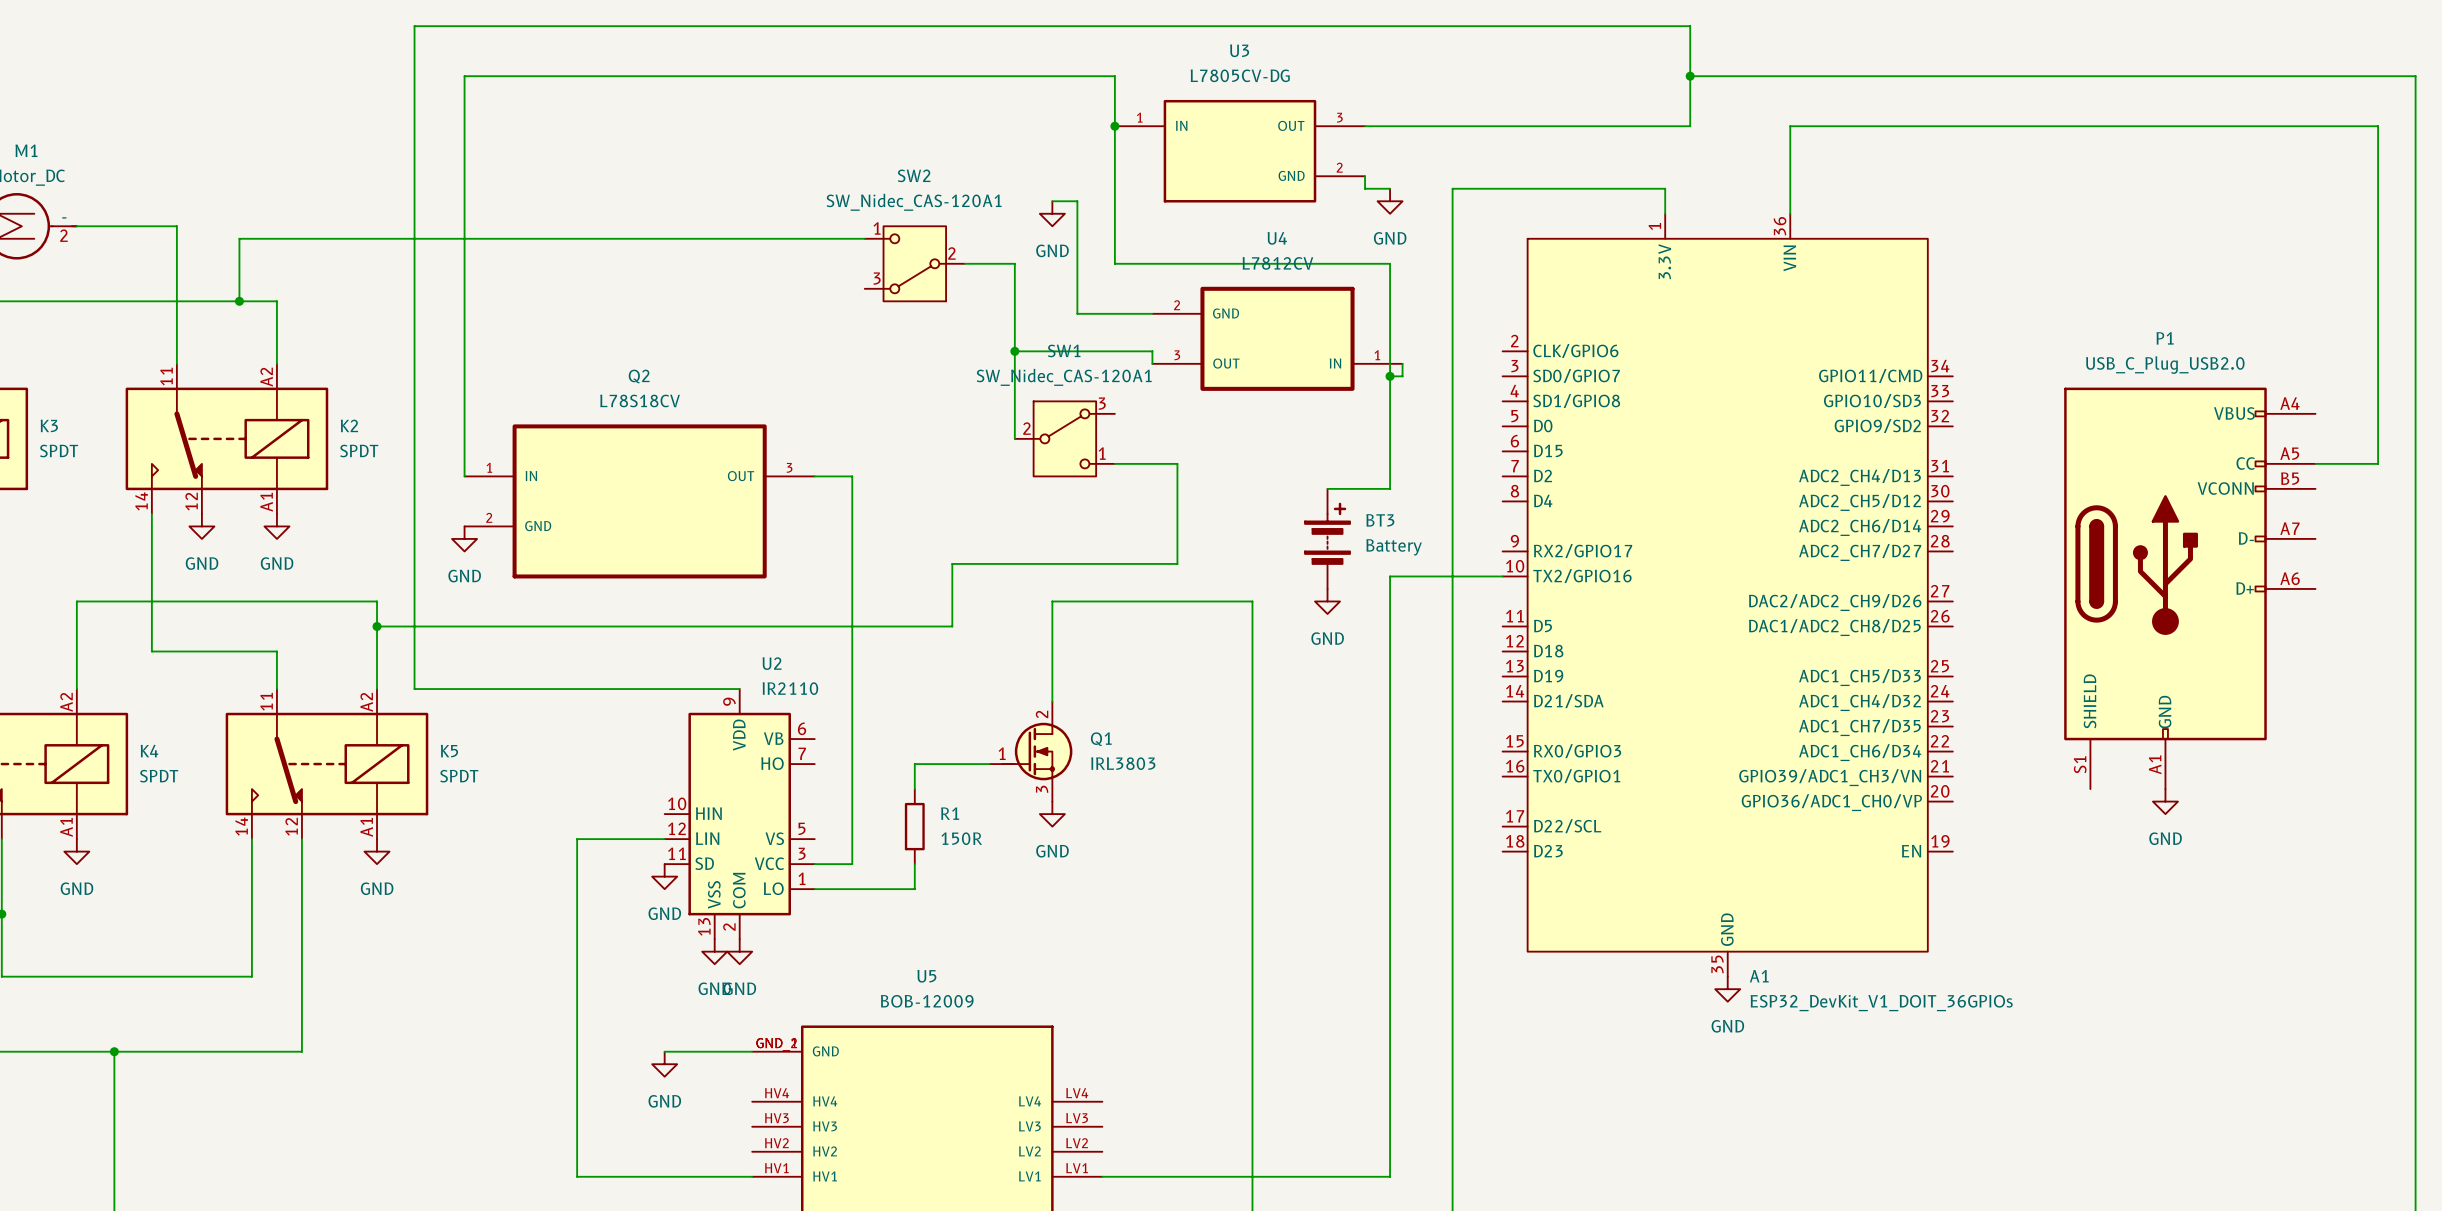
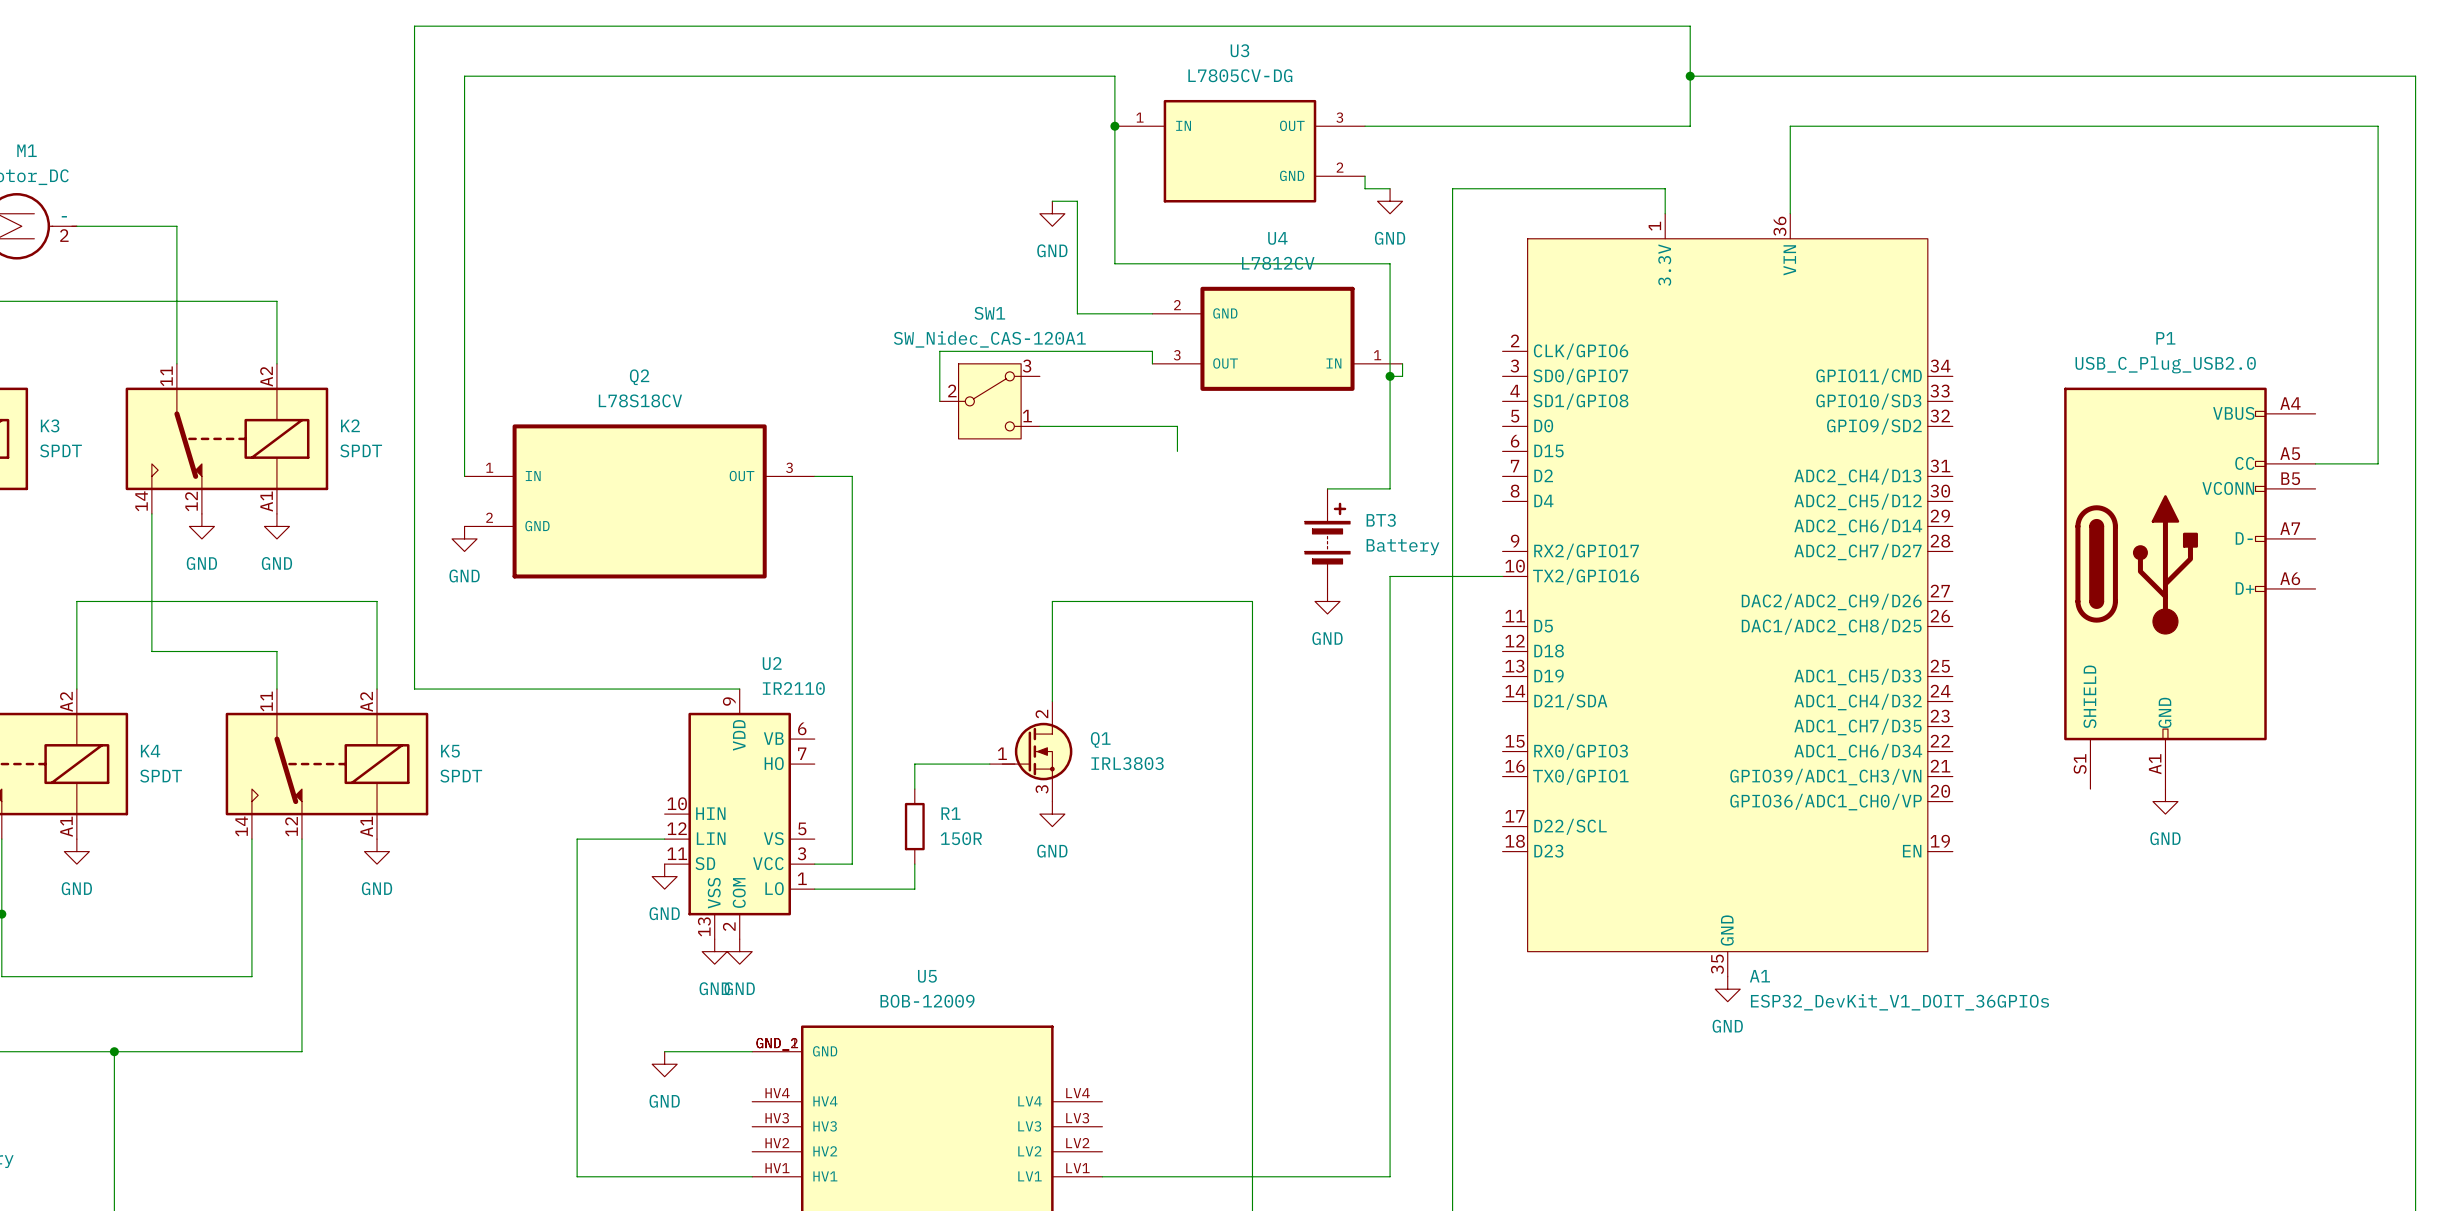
wire: (864, 238) (239, 238) (239, 301) -> none
SW2: SW_Nidec_CAS-120A1 (914, 263) -> none
wire: (964, 263) (1014, 263) (1014, 438) -> none
junction: (239, 301) -> none
wire: none -> (1014, 351) (939, 351) (939, 401)
junction: (1014, 351) -> none
wire: none -> (1039, 426) (1177, 426) (1177, 451)
SW1 position: (1064, 438) -> (989, 401)
wire: (1114, 463) (1177, 463) (1177, 563) (952, 563) (952, 626) (377, 626) -> none
junction: (377, 626) -> none

